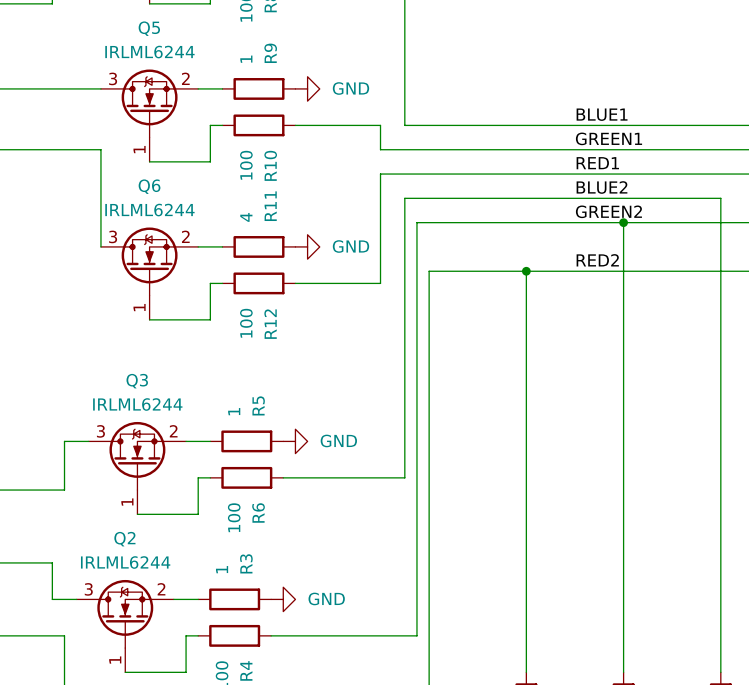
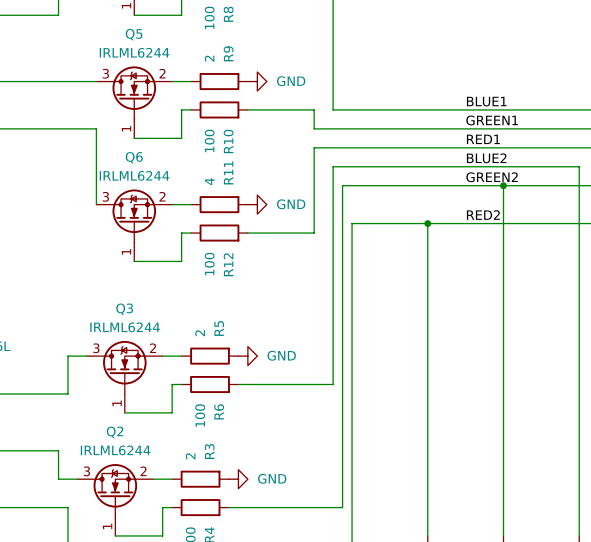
R9 value: 1 (246, 59) -> 2 (209, 58)
R5 value: 1 (234, 411) -> 2 (200, 333)
R3 value: 1 (222, 569) -> 2 (190, 456)

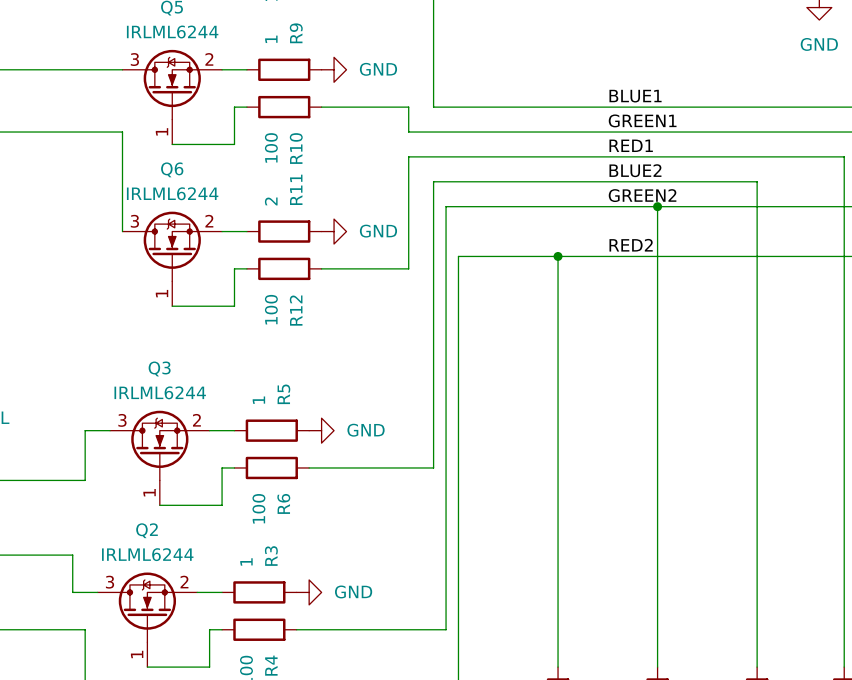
R9 value: 2 (209, 58) -> 1 (271, 39)
R11 value: 4 (209, 181) -> 2 (271, 201)
R5 value: 2 (200, 333) -> 1 (258, 400)
R3 value: 2 (190, 456) -> 1 (246, 561)

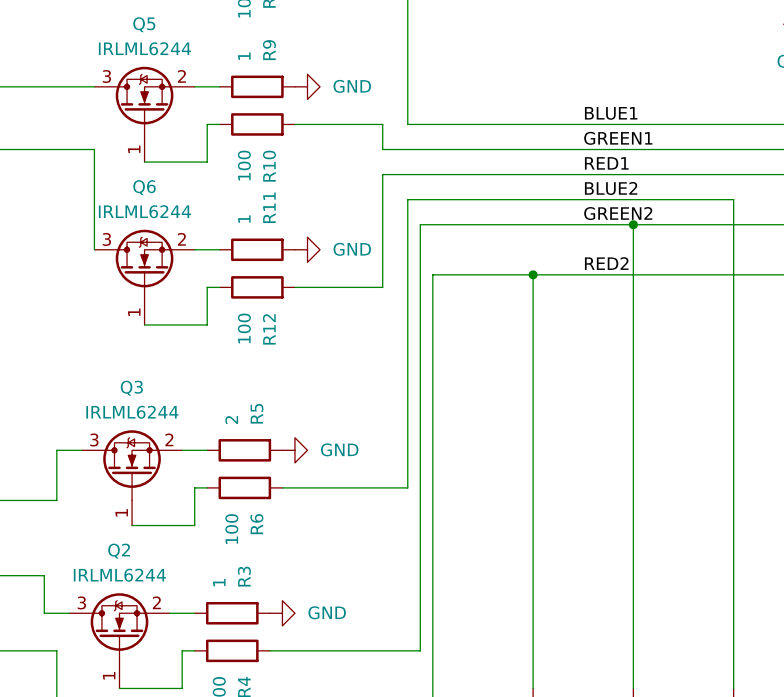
R11 value: 2 (271, 201) -> 1 (244, 219)
R5 value: 1 (258, 400) -> 2 (231, 420)

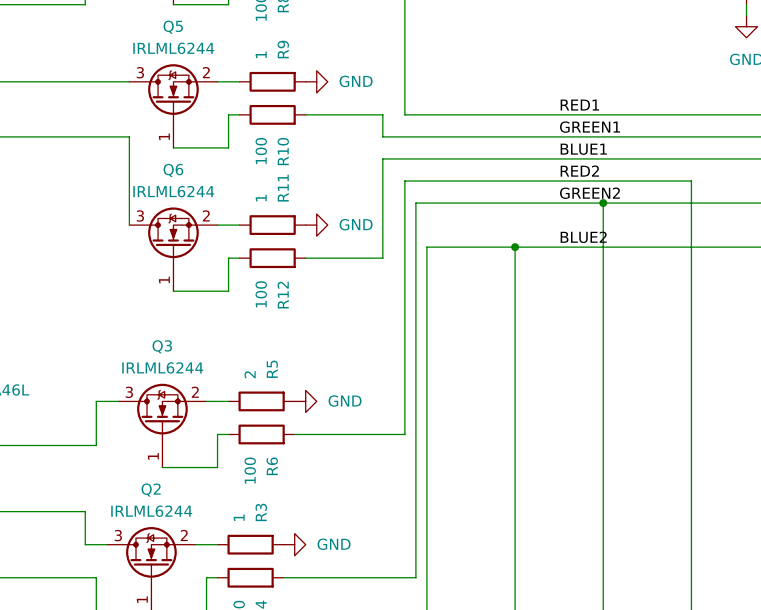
label: BLUE1 (611, 113) -> RED1 (579, 105)
label: RED1 (606, 163) -> BLUE1 (583, 149)
label: BLUE2 (611, 188) -> RED2 (579, 171)
label: RED2 (606, 263) -> BLUE2 (583, 237)

